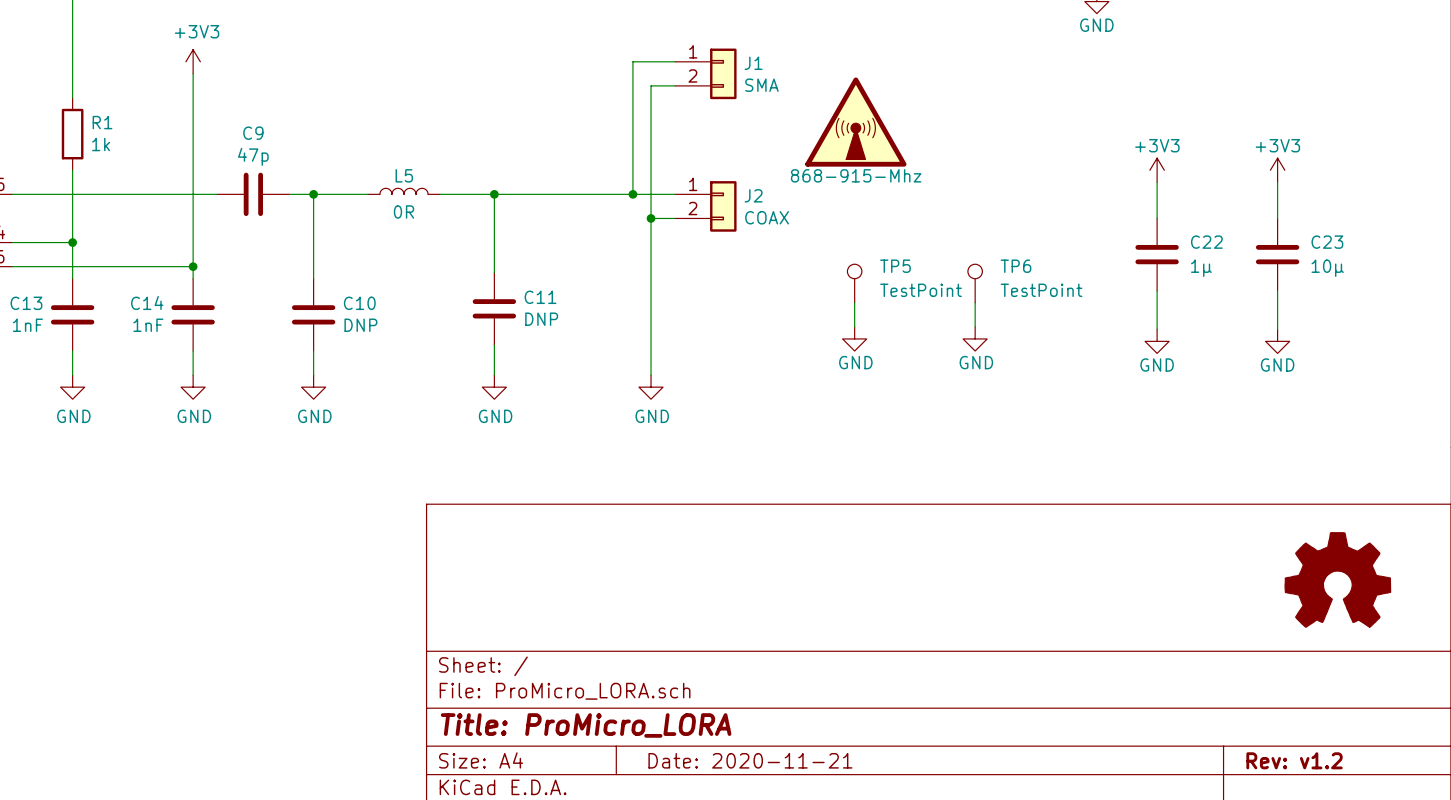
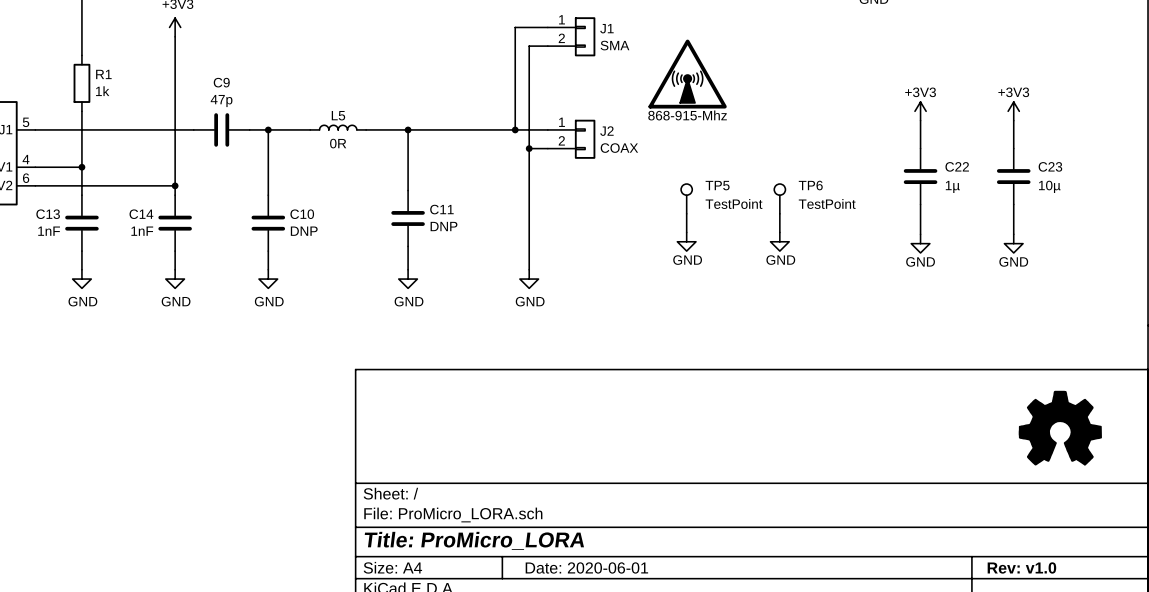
title block: Date: 2020-11-21 (750, 760) -> Date: 2020-06-01 (586, 567)
title block: Rev: v1.2 (1294, 760) -> Rev: v1.0 (1021, 567)

